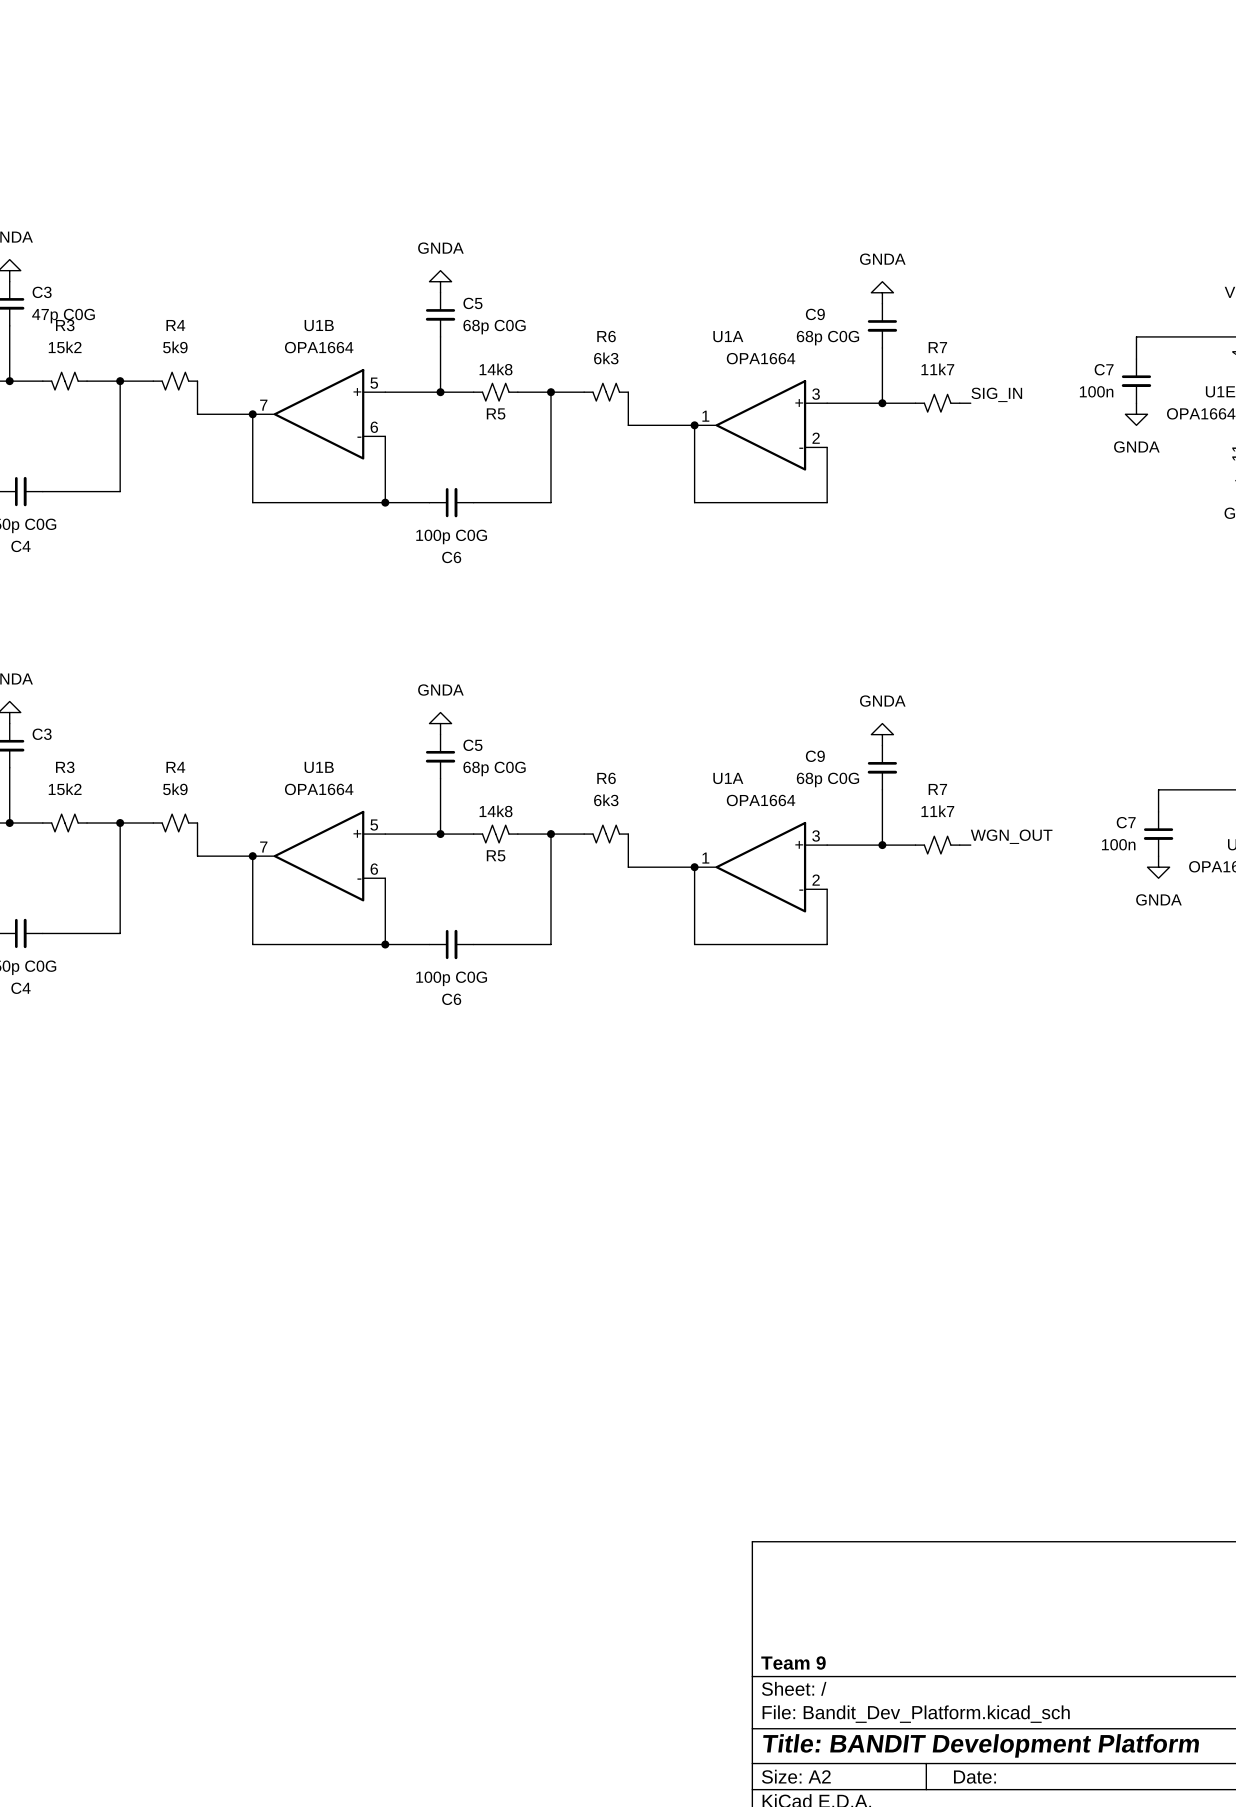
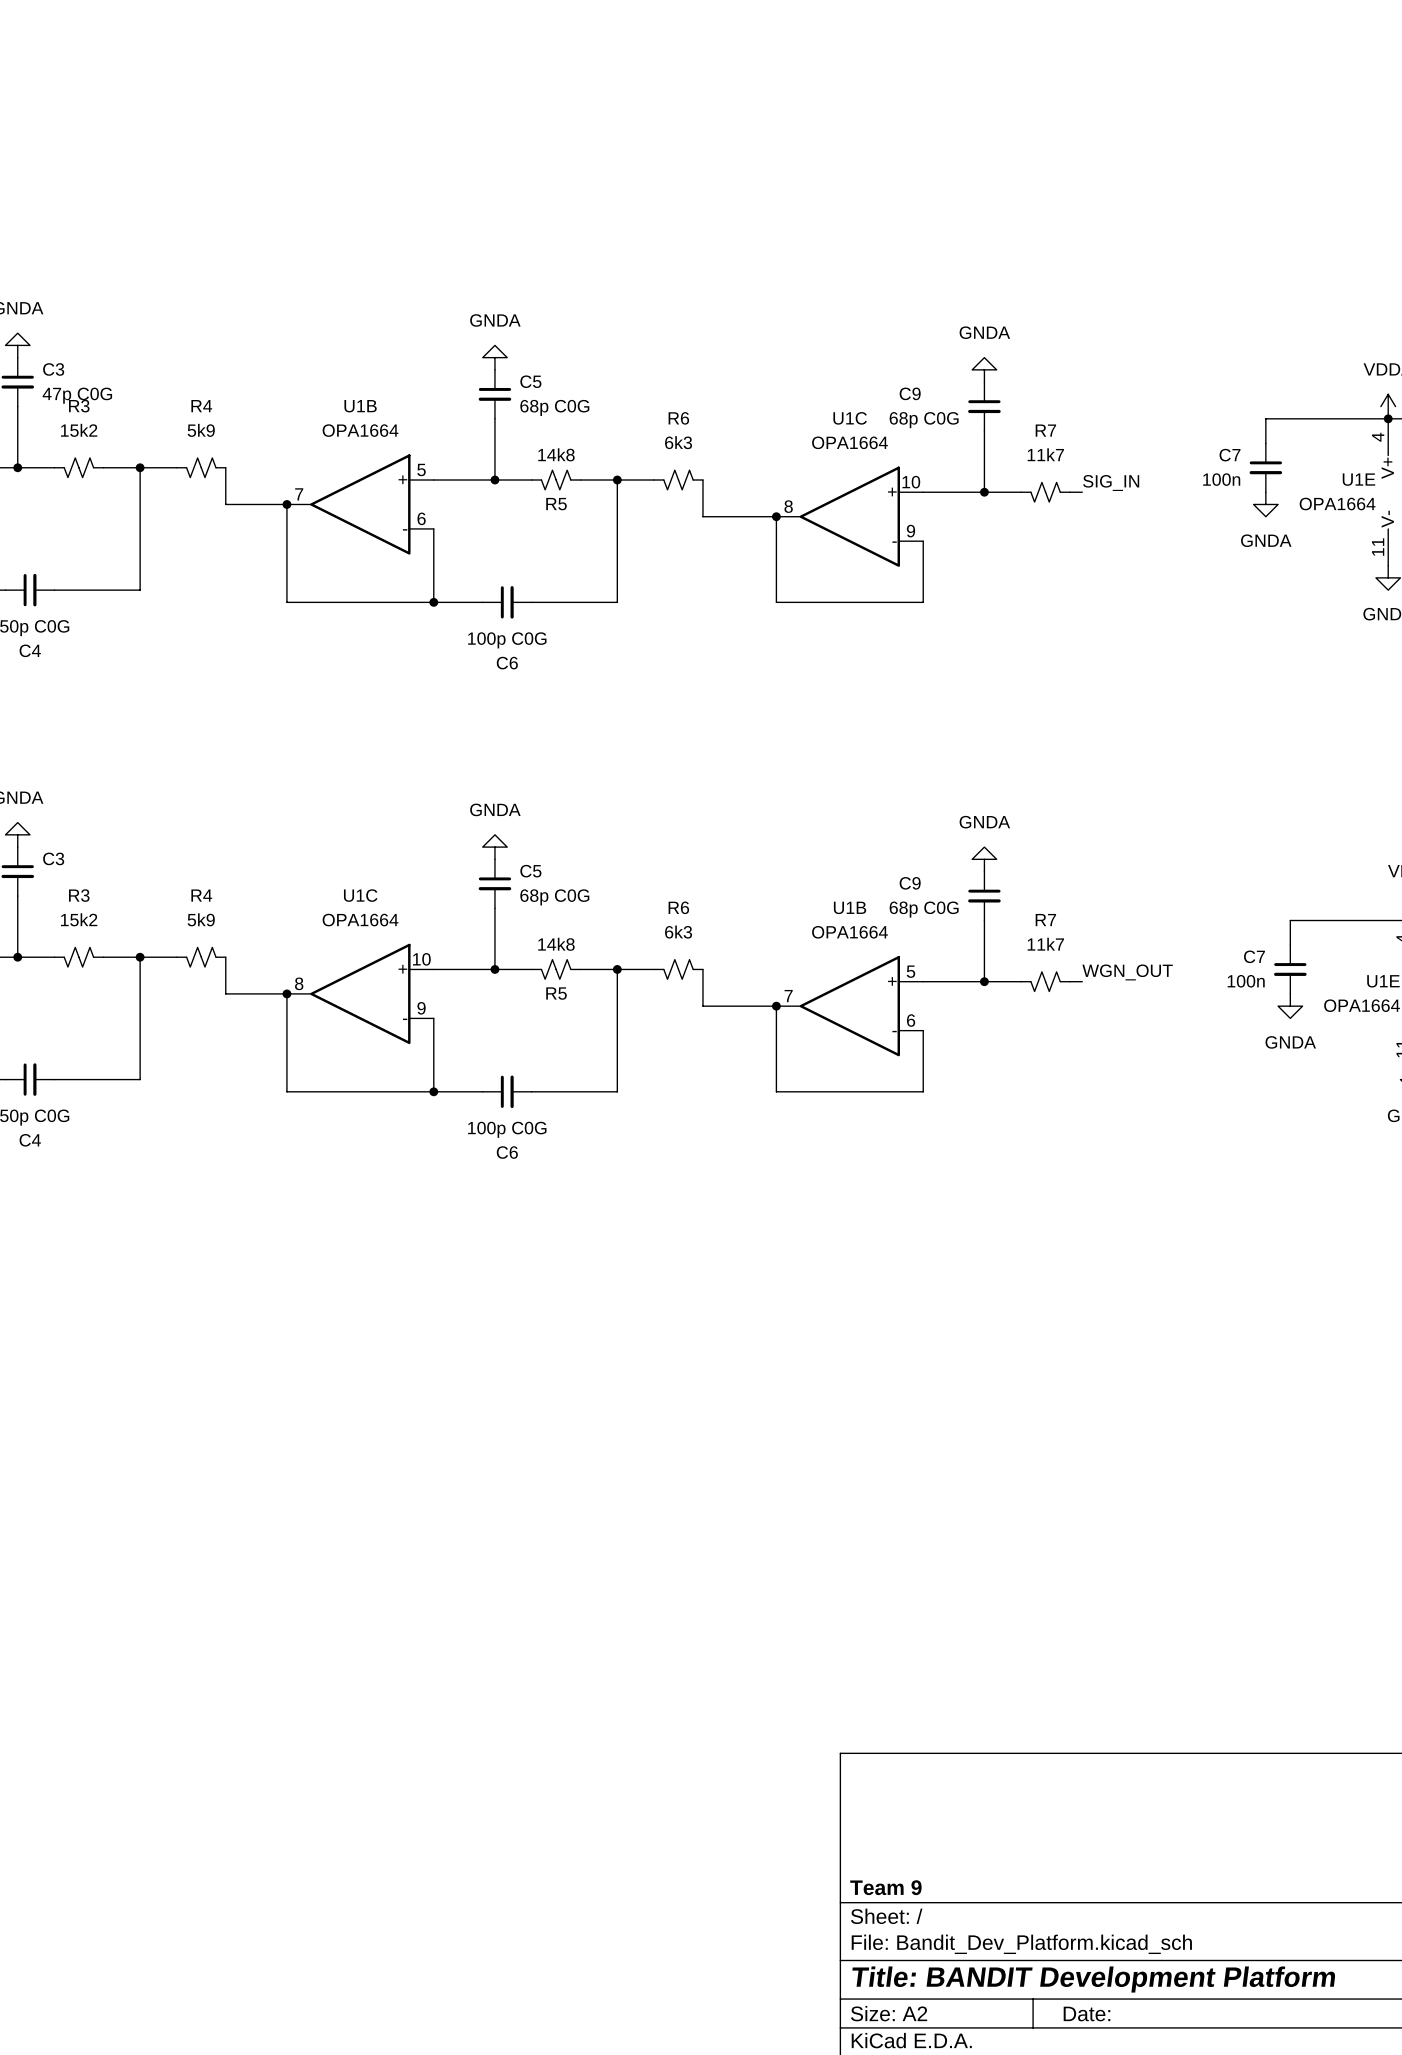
U1A name: U1A (728, 336) -> U1C (850, 418)
U1A pin number: 3 (816, 394) -> 10 (911, 482)
U1A pin number: 1 (705, 416) -> 8 (788, 506)
U1A pin number: 2 (816, 438) -> 9 (911, 531)
U1B name: U1B (319, 767) -> U1C (360, 895)
U1A name: U1A (728, 778) -> U1B (850, 907)
U1B pin number: 5 (374, 825) -> 10 (421, 959)
U1A pin number: 3 (816, 835) -> 5 (910, 971)
U1B pin number: 7 (263, 847) -> 8 (299, 983)
U1A pin number: 1 (705, 858) -> 7 (788, 996)
U1B pin number: 6 (374, 869) -> 9 (421, 1008)
U1A pin number: 2 (816, 880) -> 6 (911, 1020)

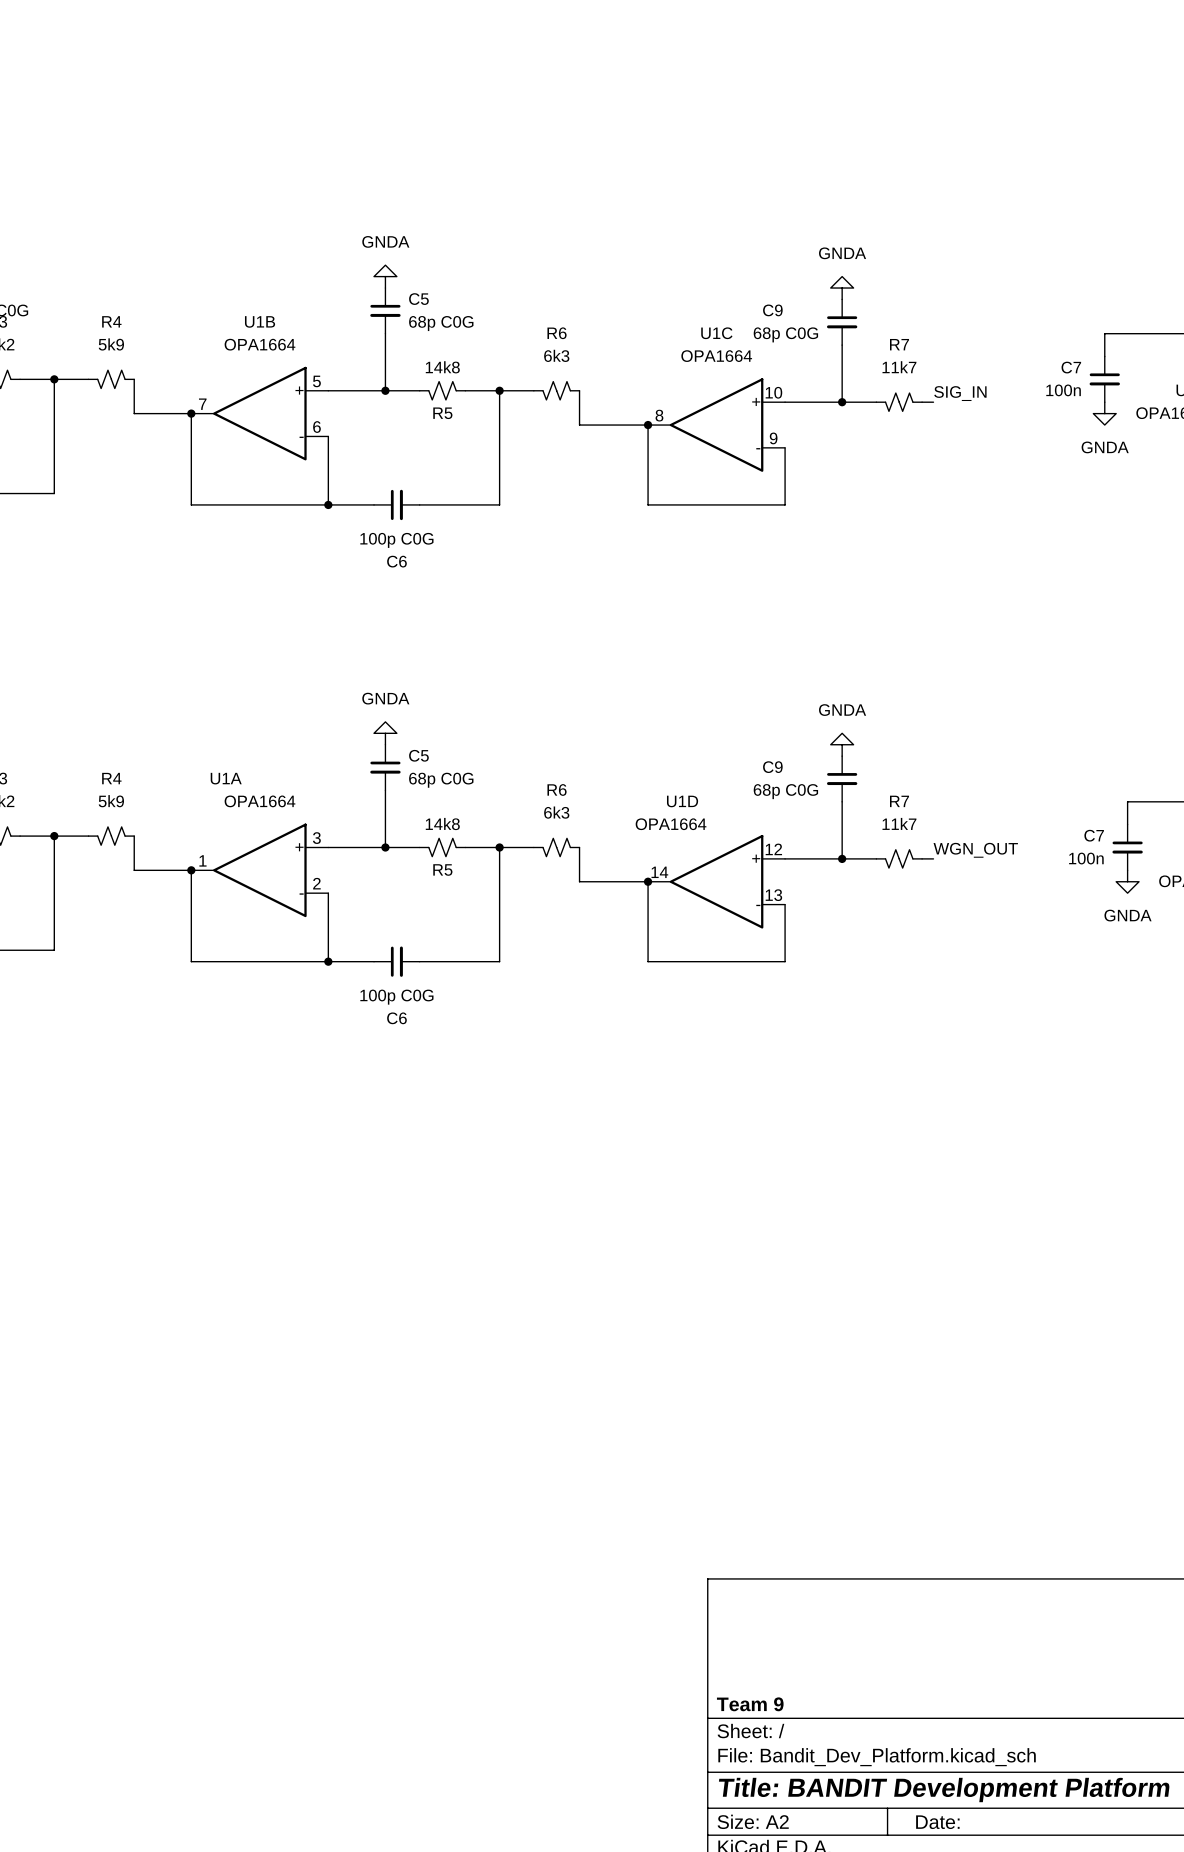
U1C name: U1C (360, 895) -> U1A (226, 778)
U1B name: U1B (850, 907) -> U1D (682, 801)
U1B value position: OPA1664 (849, 932) -> OPA1664 (671, 824)
U1C pin number: 10 (421, 959) -> 3 (316, 838)
U1B pin number: 5 (910, 971) -> 12 (773, 849)
U1C pin number: 8 (299, 983) -> 1 (202, 860)
U1B pin number: 7 (788, 996) -> 14 (659, 872)
U1C pin number: 9 (421, 1008) -> 2 (316, 883)
U1B pin number: 6 (911, 1020) -> 13 (773, 895)

